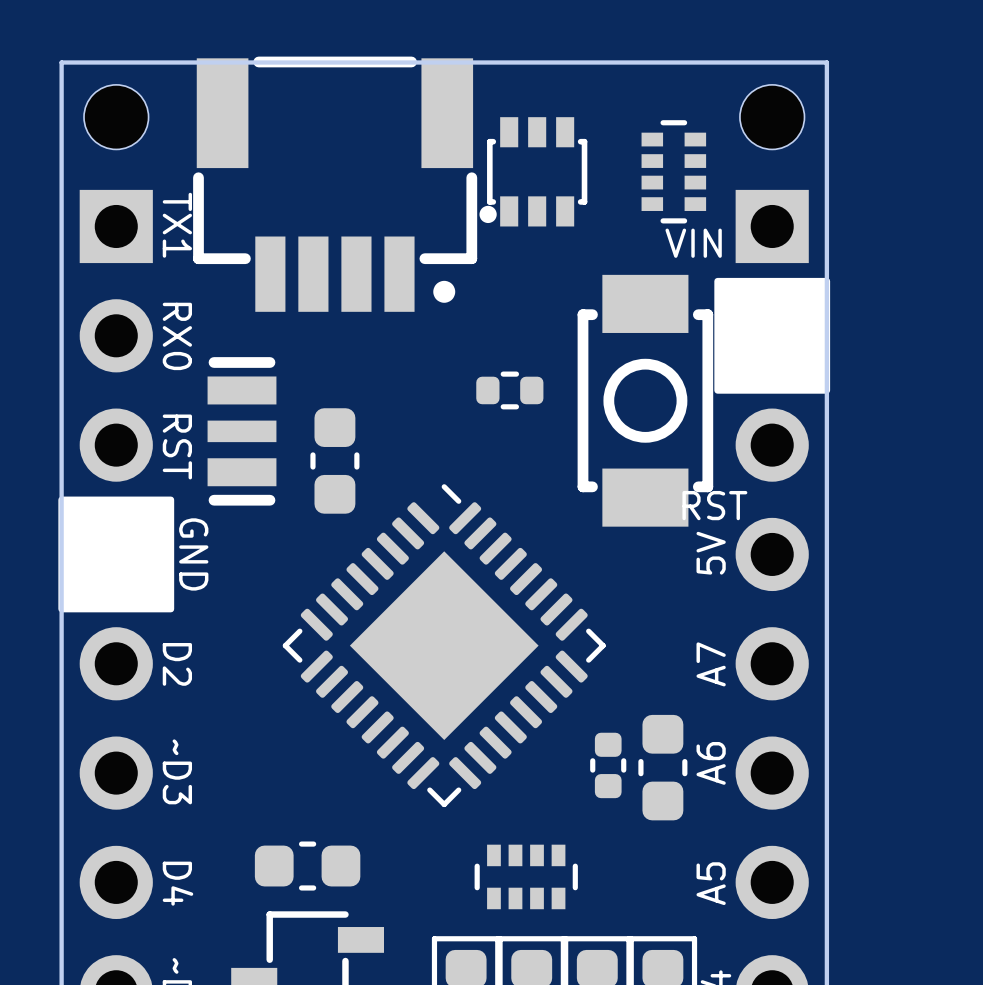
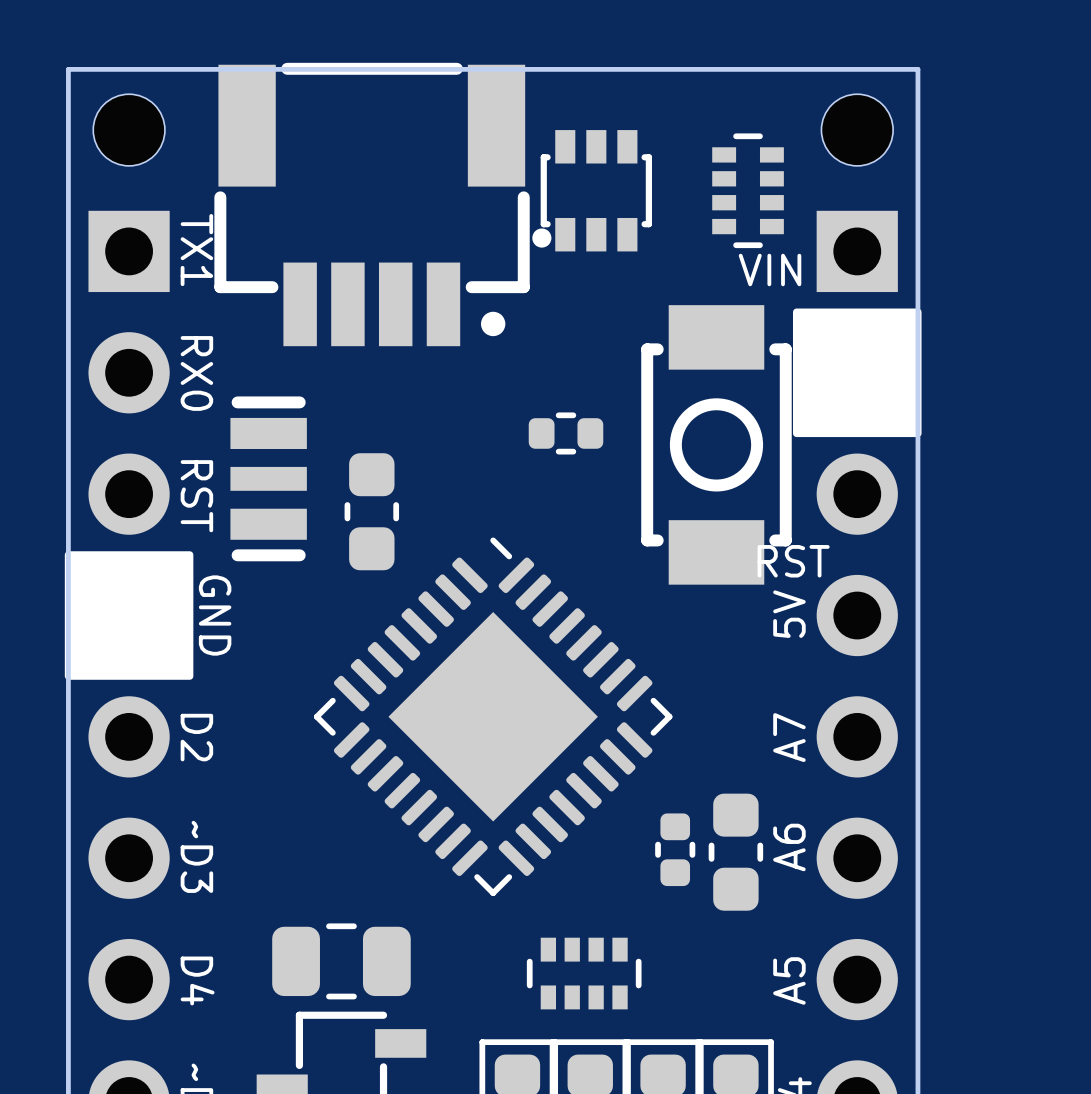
part footprint: [254, 841, 361, 891] -> [272, 923, 411, 1000]

